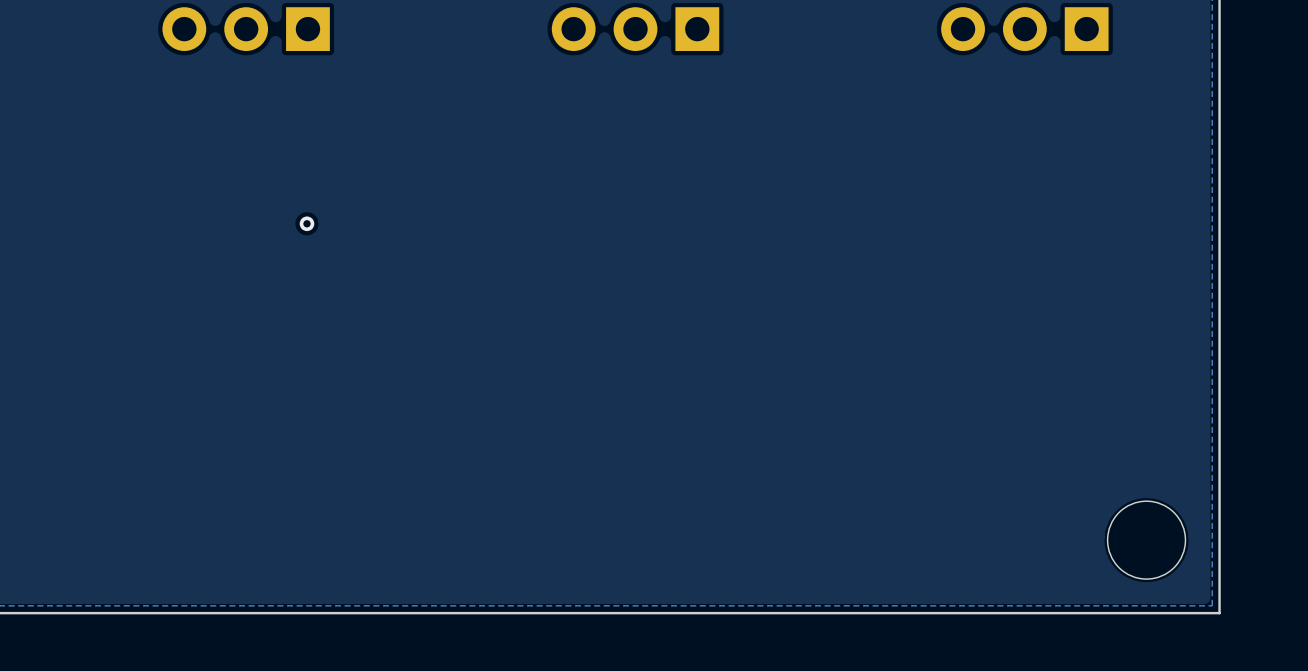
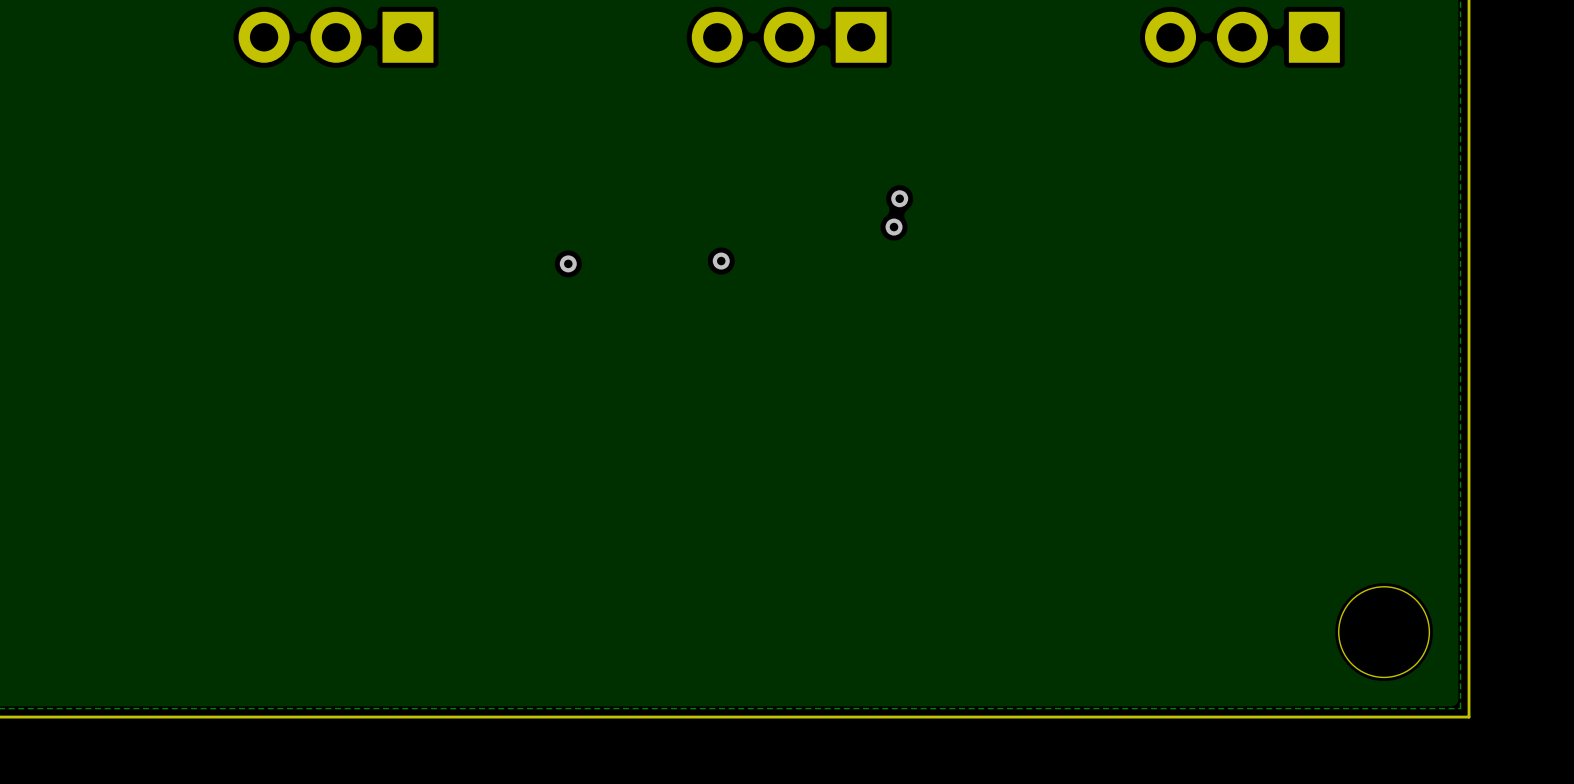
via: none -> (899, 198)
via: none -> (894, 227)
via: none -> (721, 261)
via: (306, 223) -> none
via: none -> (568, 263)

